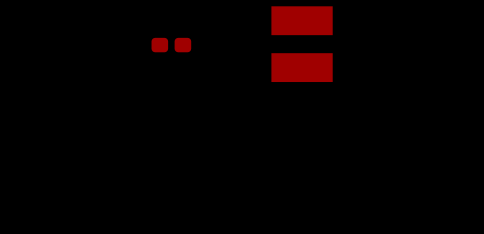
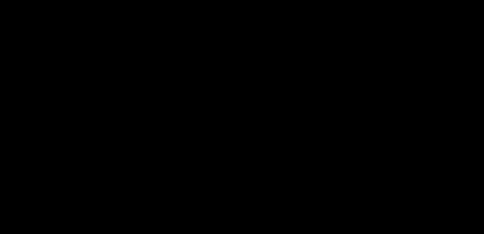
part: (302, 44) -> none
part: (171, 45) -> none

